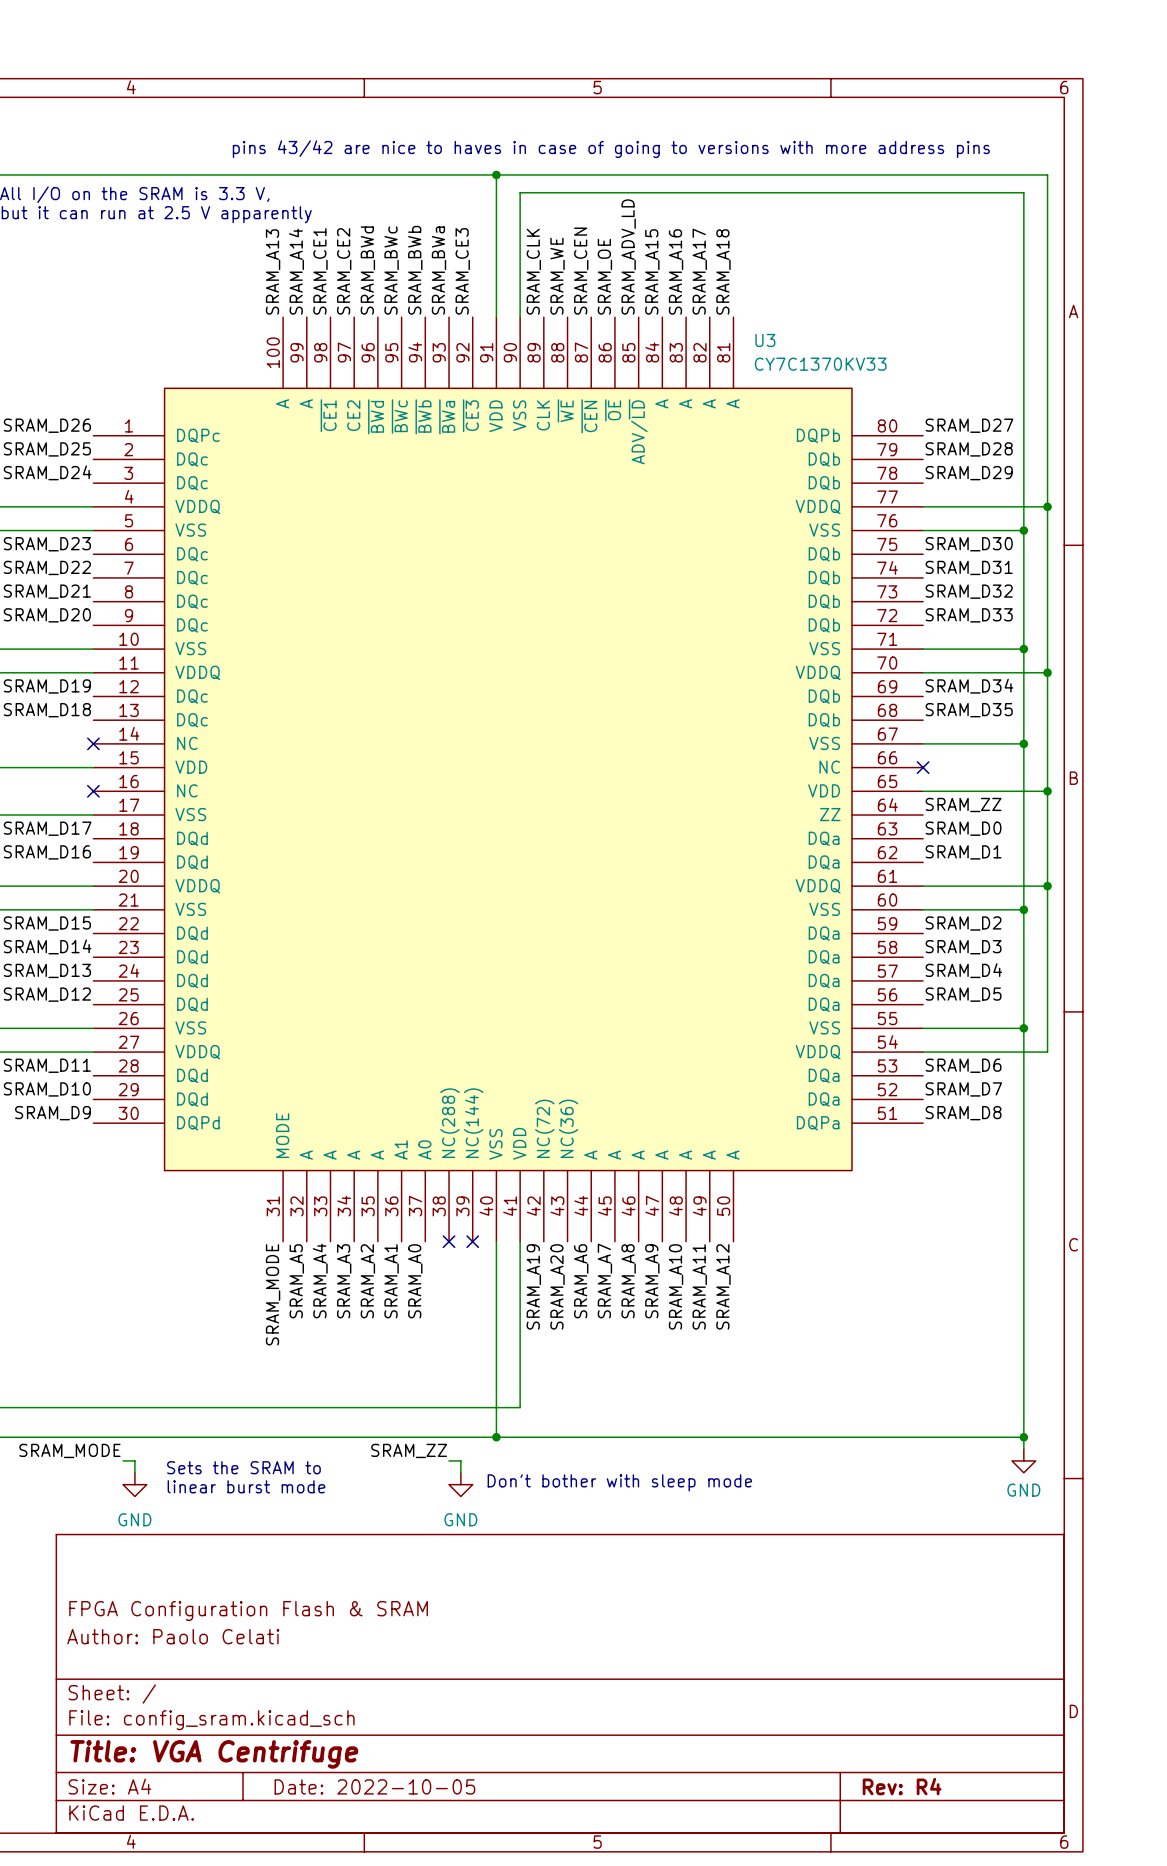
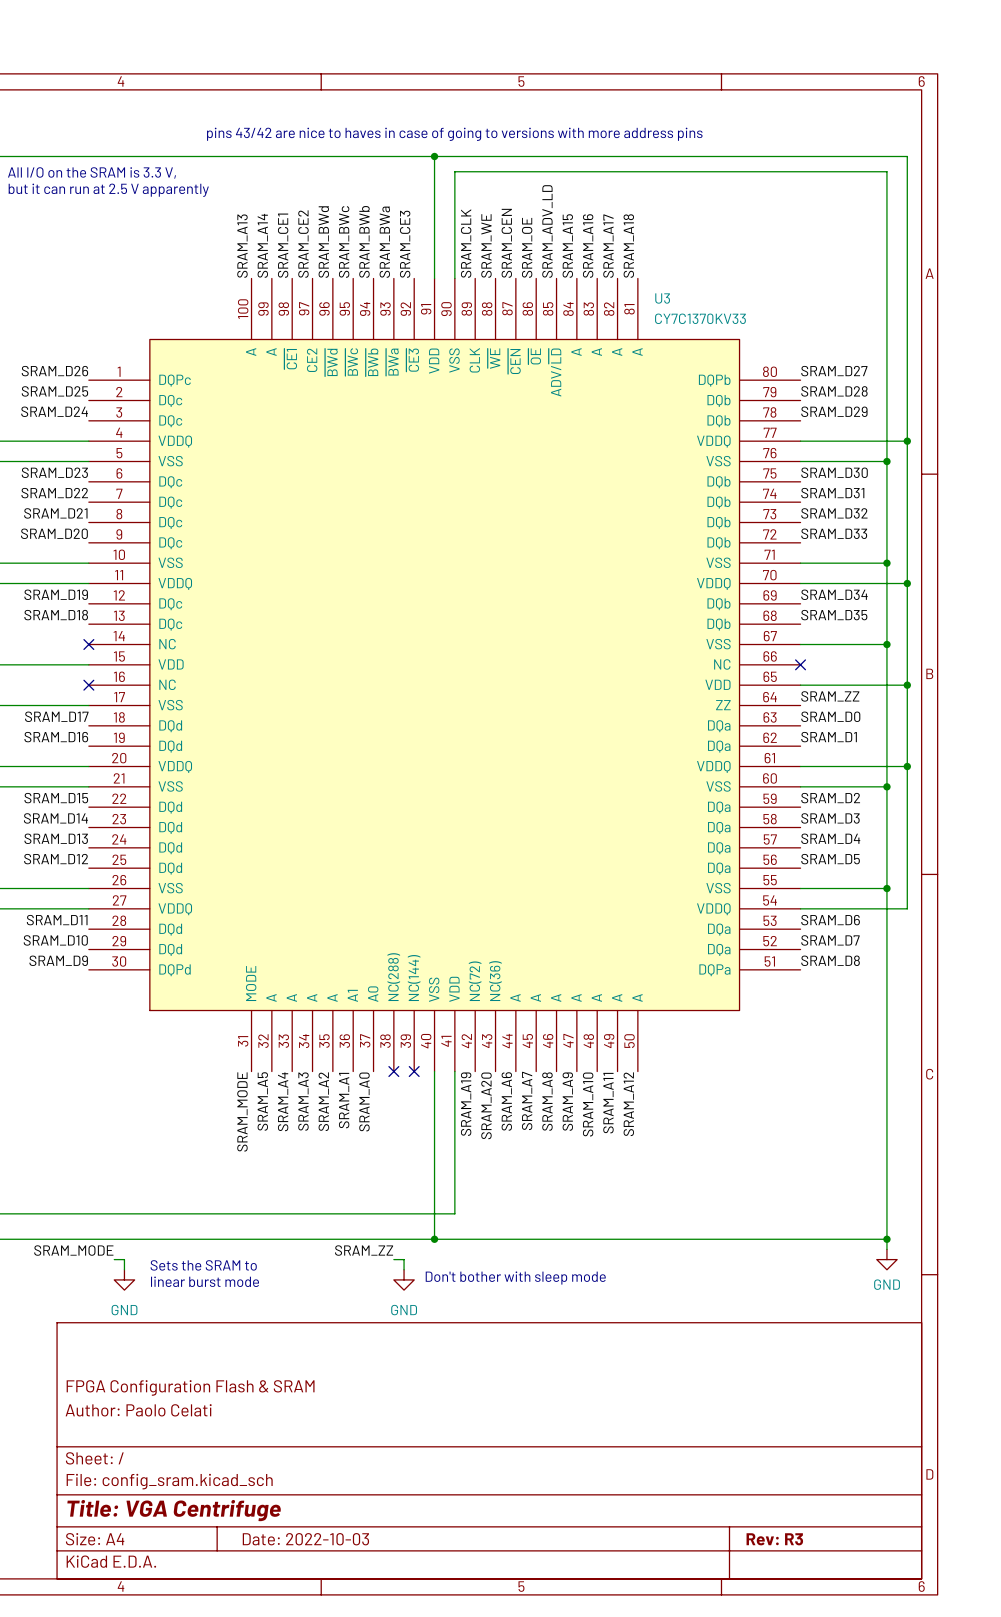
title block: Date: 2022-10-05 (374, 1786) -> Date: 2022-10-03 (305, 1539)
title block: Rev: R4 (902, 1786) -> Rev: R3 (774, 1539)

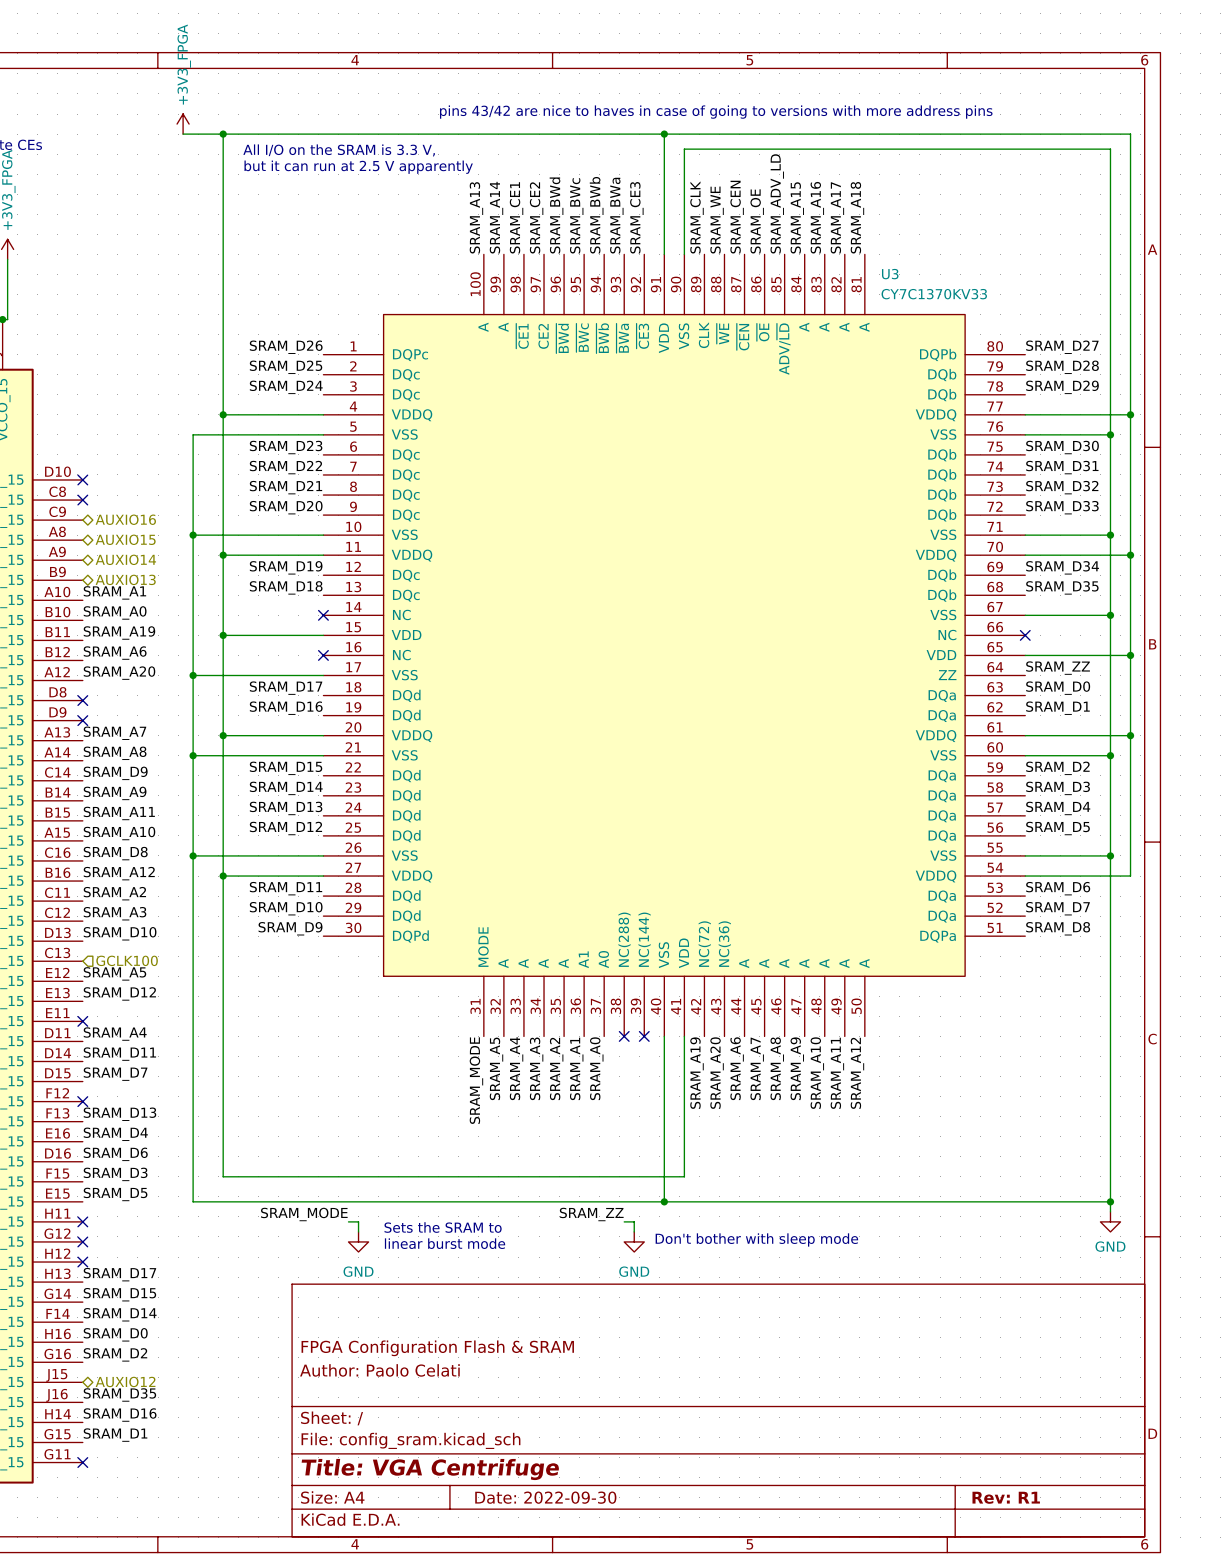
title block: Date: 2022-10-03 (305, 1539) -> Date: 2022-09-30 (545, 1497)
title block: Rev: R3 (774, 1539) -> Rev: R1 (1006, 1497)

